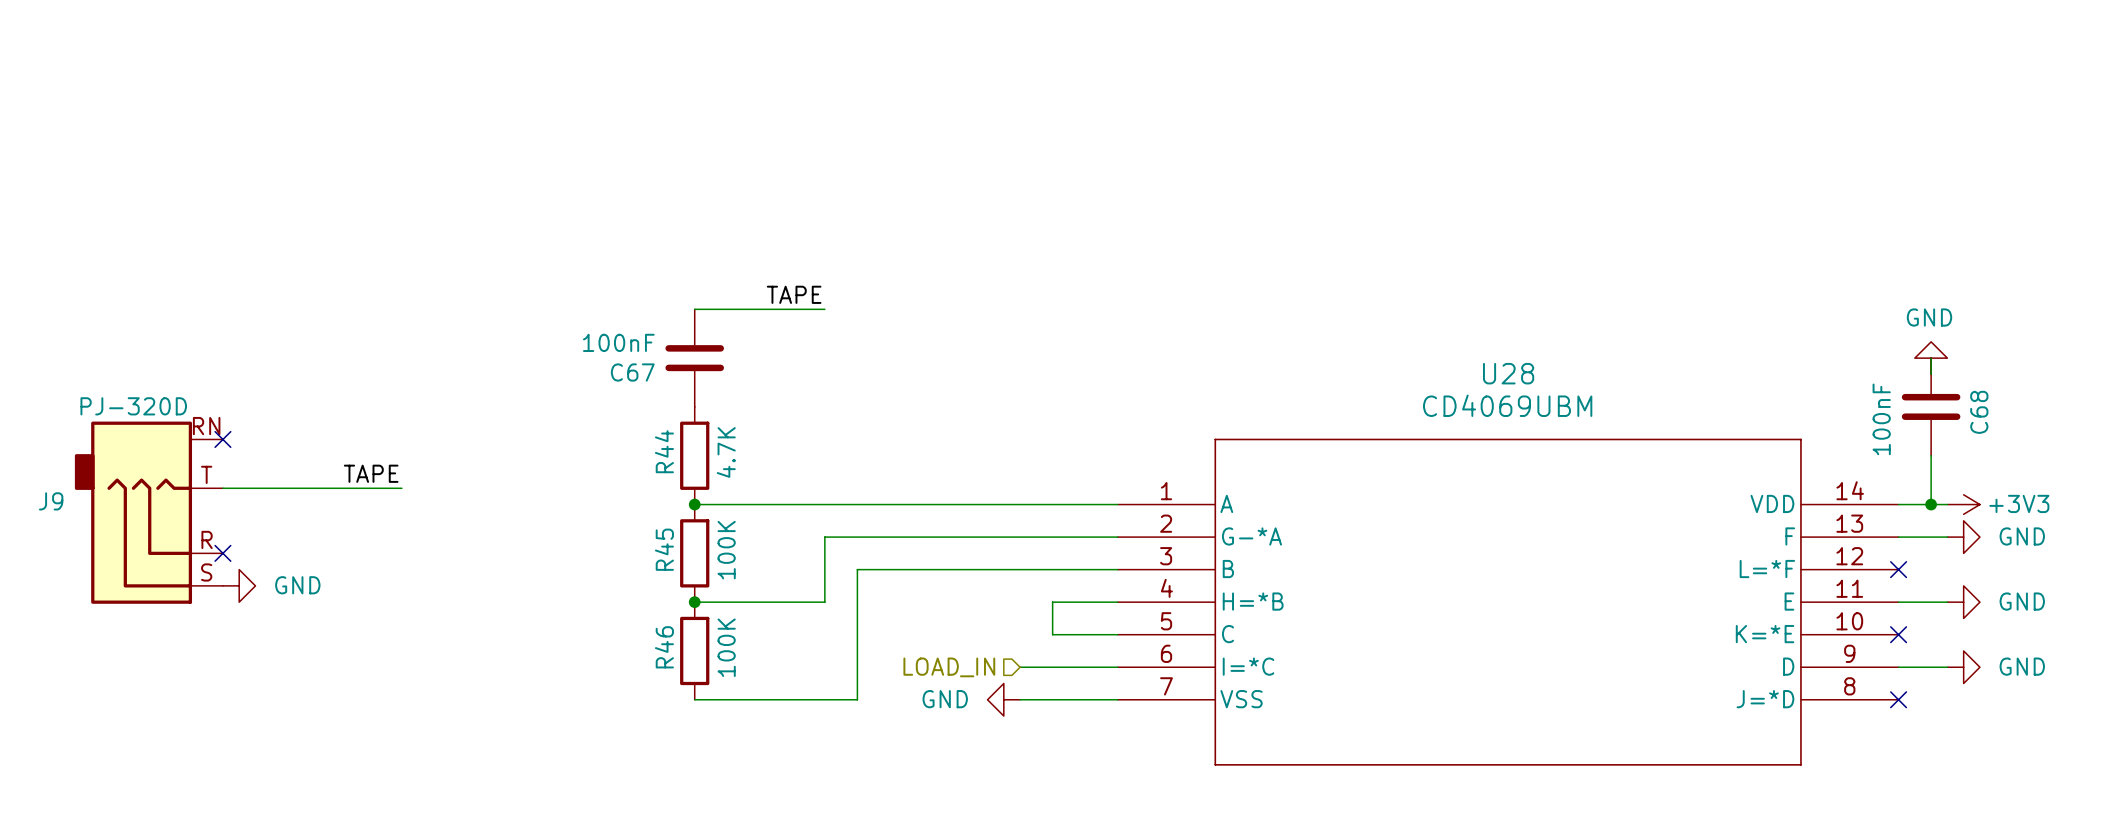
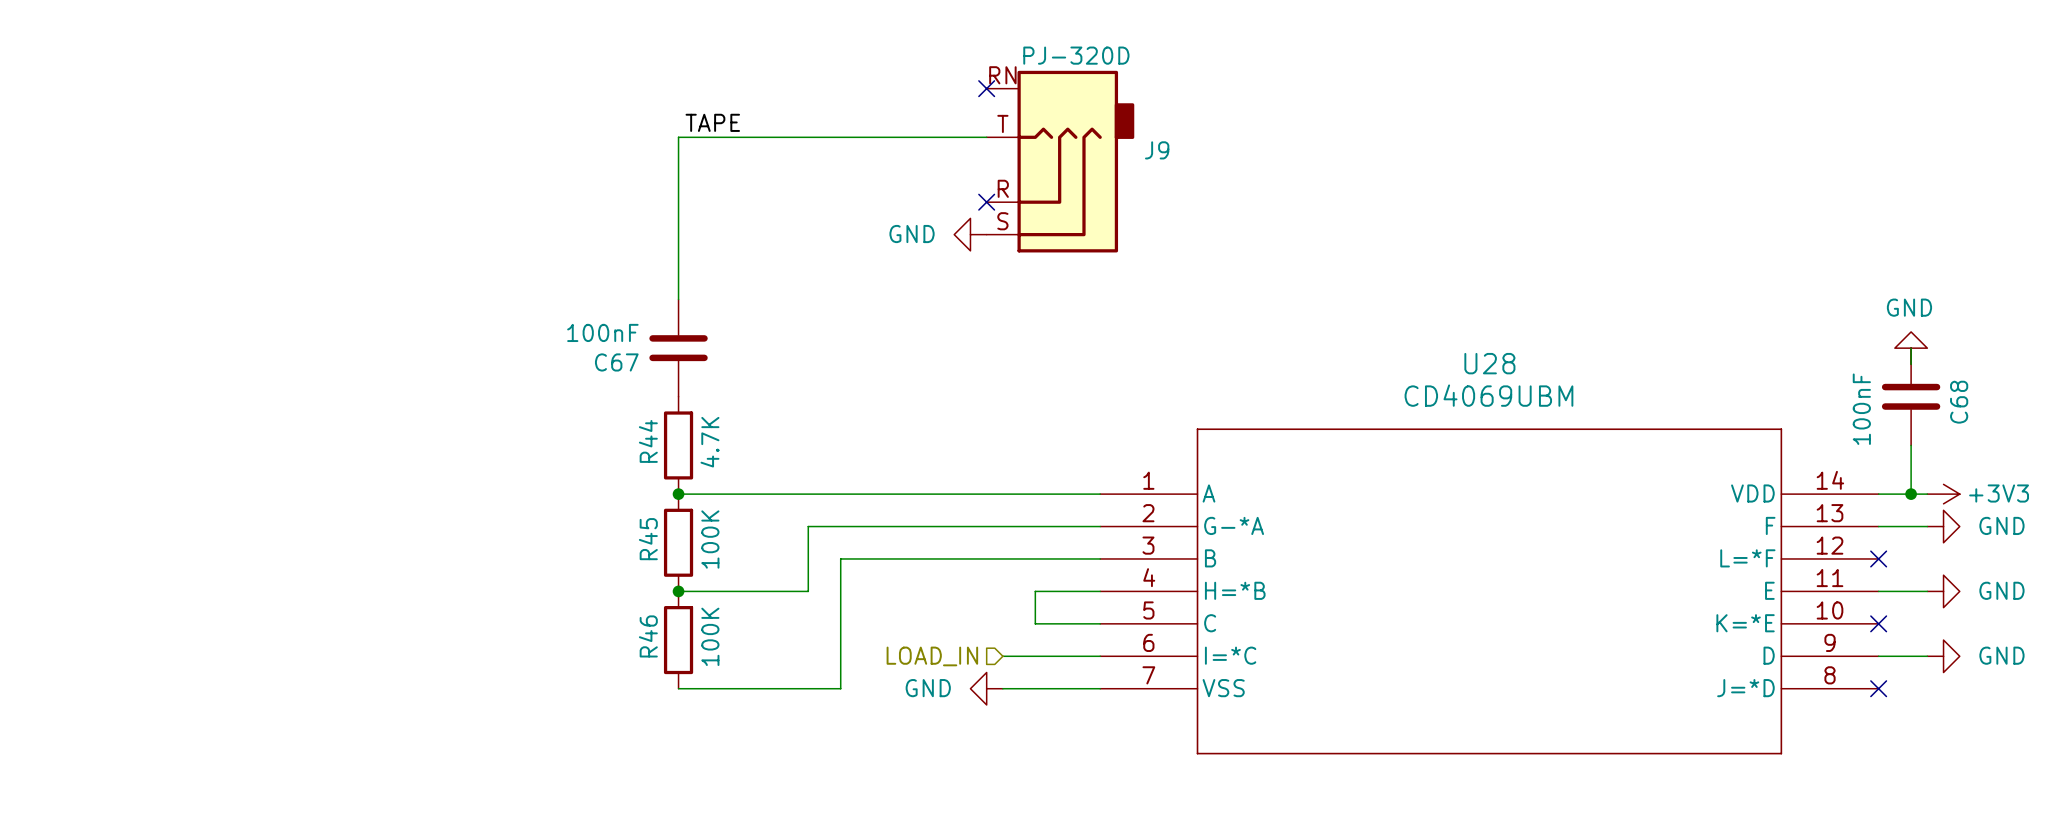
no-connect mark: none -> (986, 88)
no-connect mark: none -> (986, 202)
power symbol: none -> GND (970, 234)
label position: TAPE (794, 294) -> TAPE (712, 122)
wire: (694, 309) (824, 309) -> (678, 299) (678, 137) (986, 137)
no-connect mark: (222, 439) -> none
label: TAPE (371, 473) -> none
wire: (222, 488) (401, 488) -> none
J9 flip: as is (133, 512) -> left-right (1075, 161)
J9 position: (148, 512) -> (1060, 161)
no-connect mark: (222, 553) -> none
power symbol: GND (239, 585) -> none

